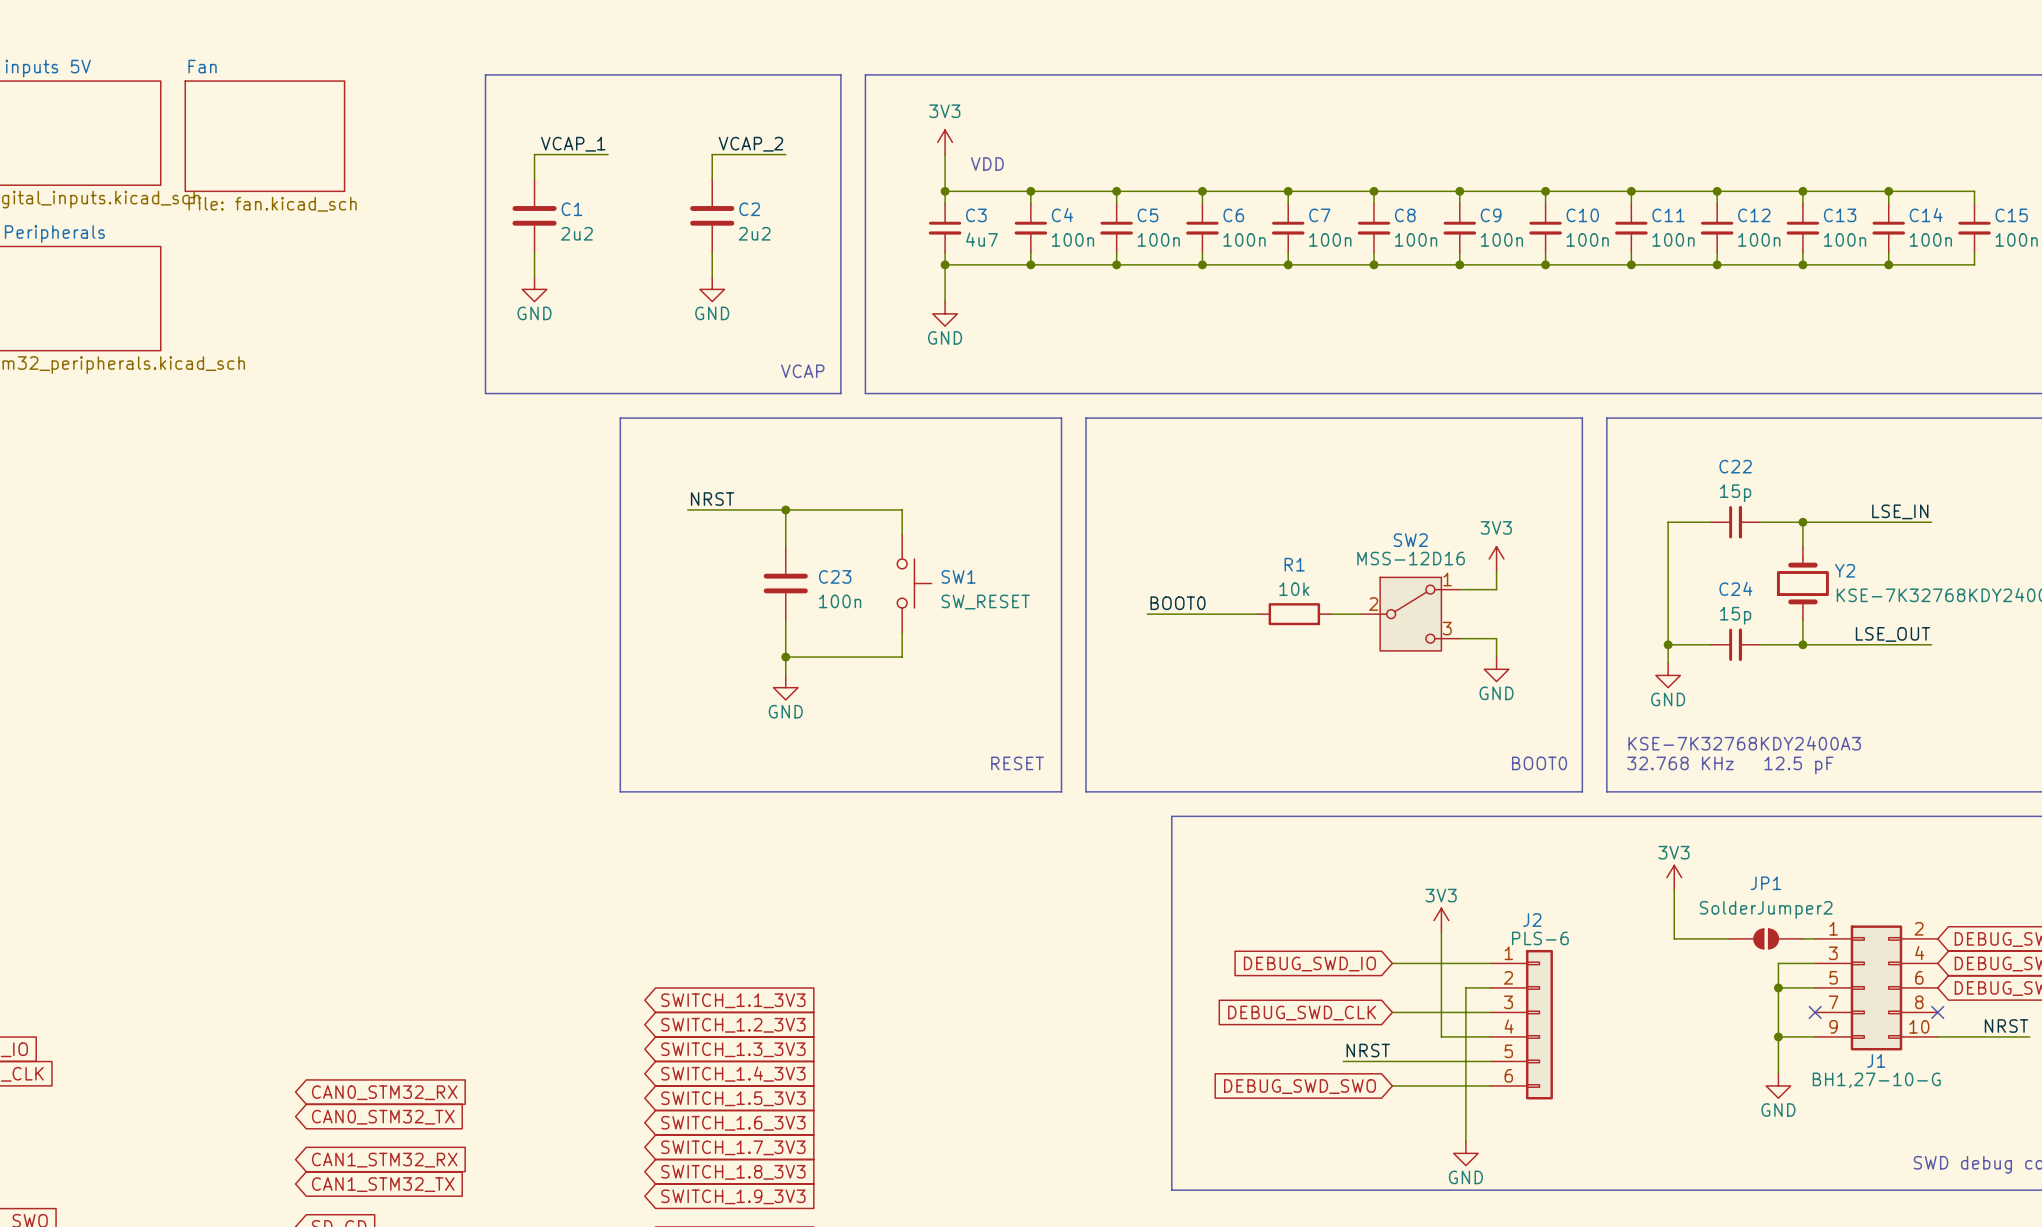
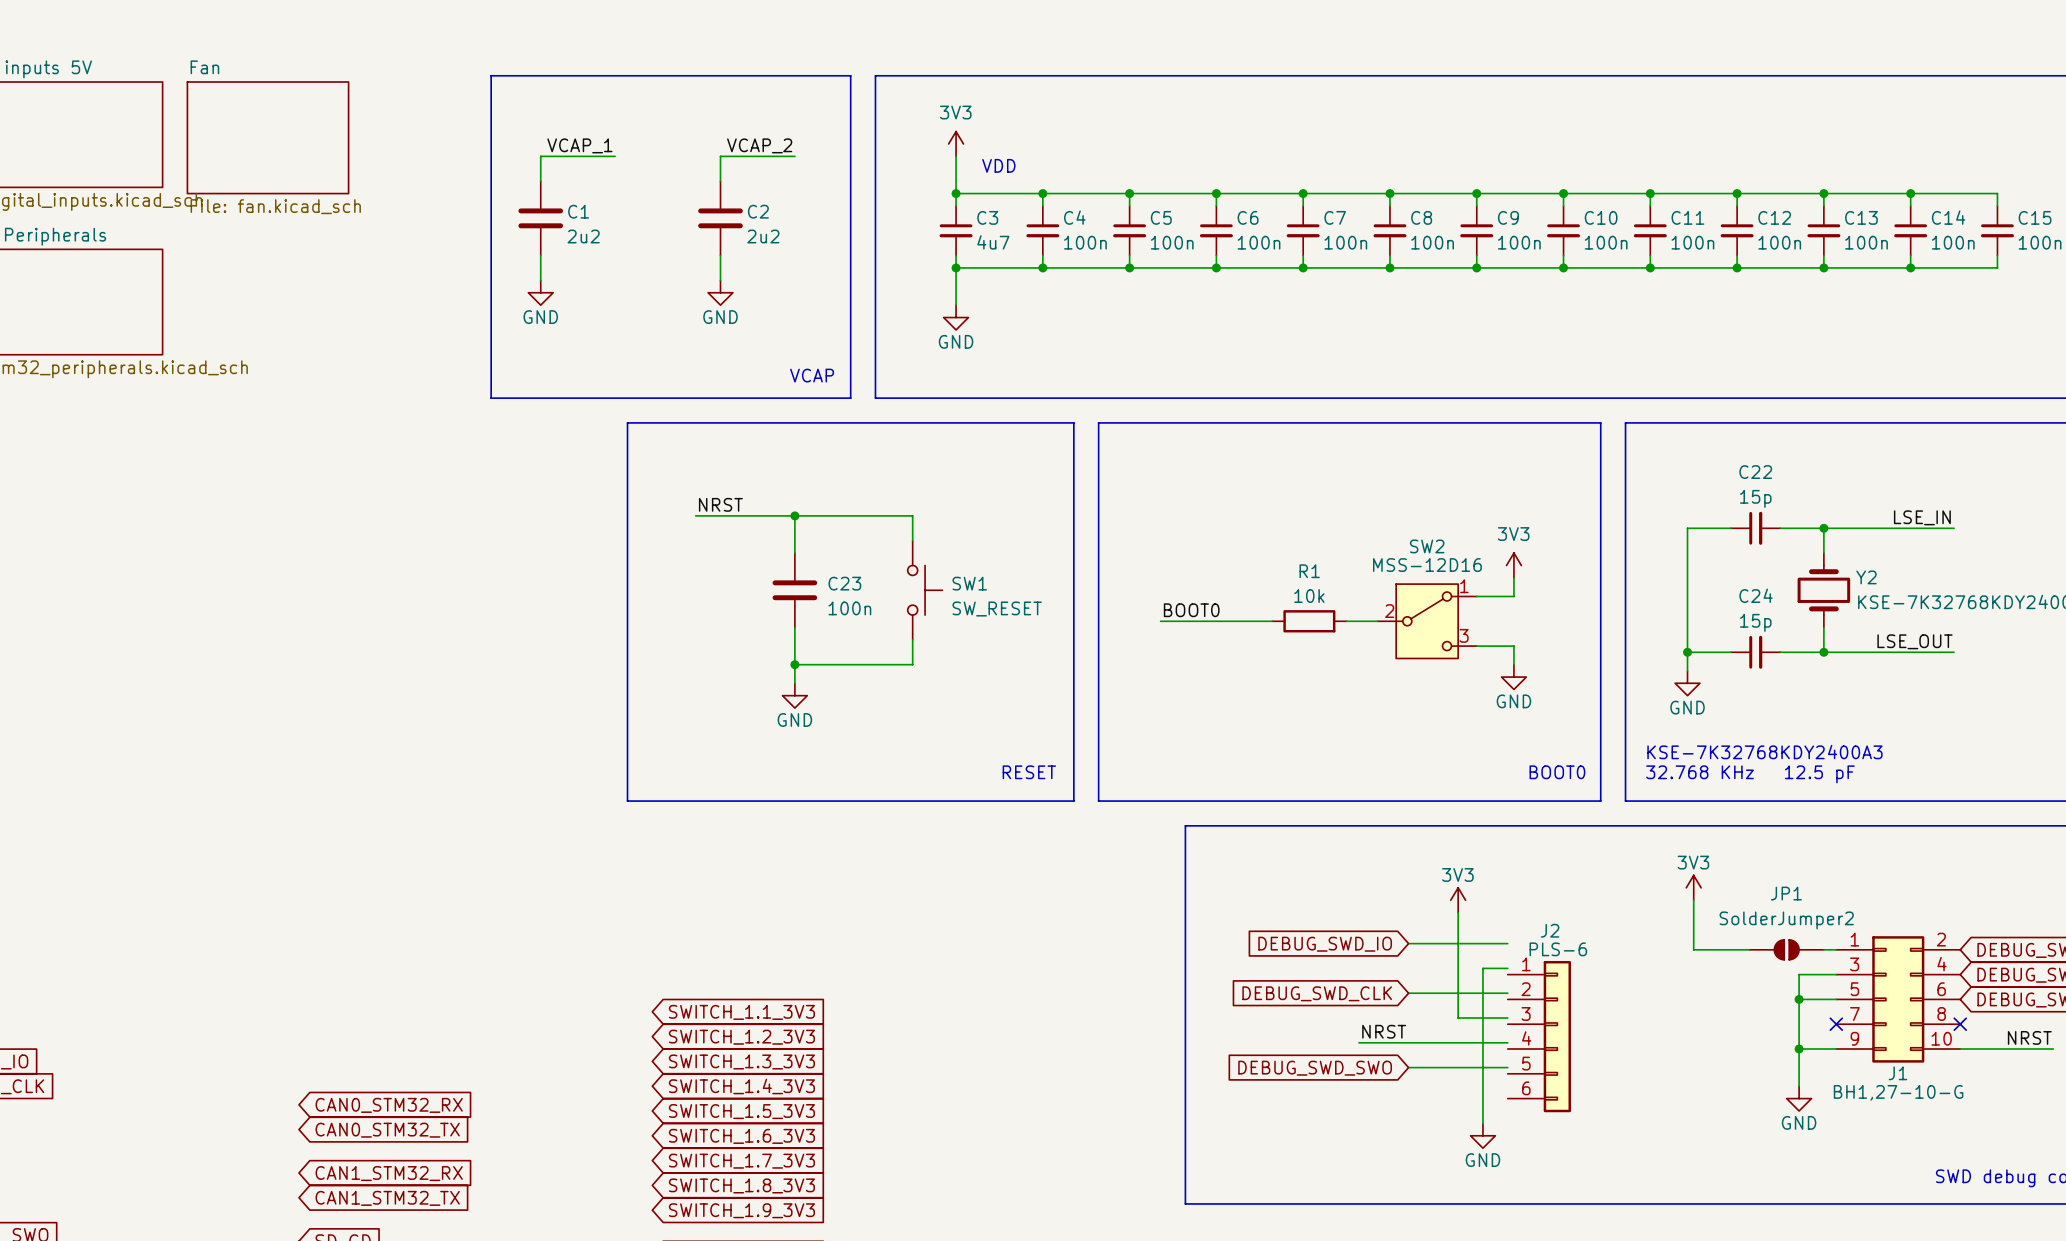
power symbol position: 3V3 (1441, 920) -> 3V3 (1458, 900)
wire: (1392, 963) (1490, 963) -> (1408, 943) (1507, 943)
global label position: DEBUG_SWD_IO (1309, 964) -> DEBUG_SWD_IO (1325, 944)
wire: (1465, 987) (1490, 987) -> (1482, 999) (1482, 968) (1507, 968)
wire: (1441, 1006) (1441, 1036) (1490, 1036) -> (1458, 1018) (1507, 1018)
wire: (1392, 1012) (1490, 1012) -> (1408, 993) (1507, 993)
global label position: DEBUG_SWD_CLK (1302, 1013) -> DEBUG_SWD_CLK (1317, 993)
label position: NRST (1368, 1050) -> NRST (1384, 1031)
wire: (1343, 1061) (1490, 1061) -> (1358, 1042) (1507, 1042)
wire: (1392, 1085) (1490, 1085) -> (1408, 1067) (1507, 1067)
global label position: DEBUG_SWD_SWO (1300, 1086) -> DEBUG_SWD_SWO (1315, 1068)
power symbol position: GND (1465, 1153) -> GND (1482, 1135)

